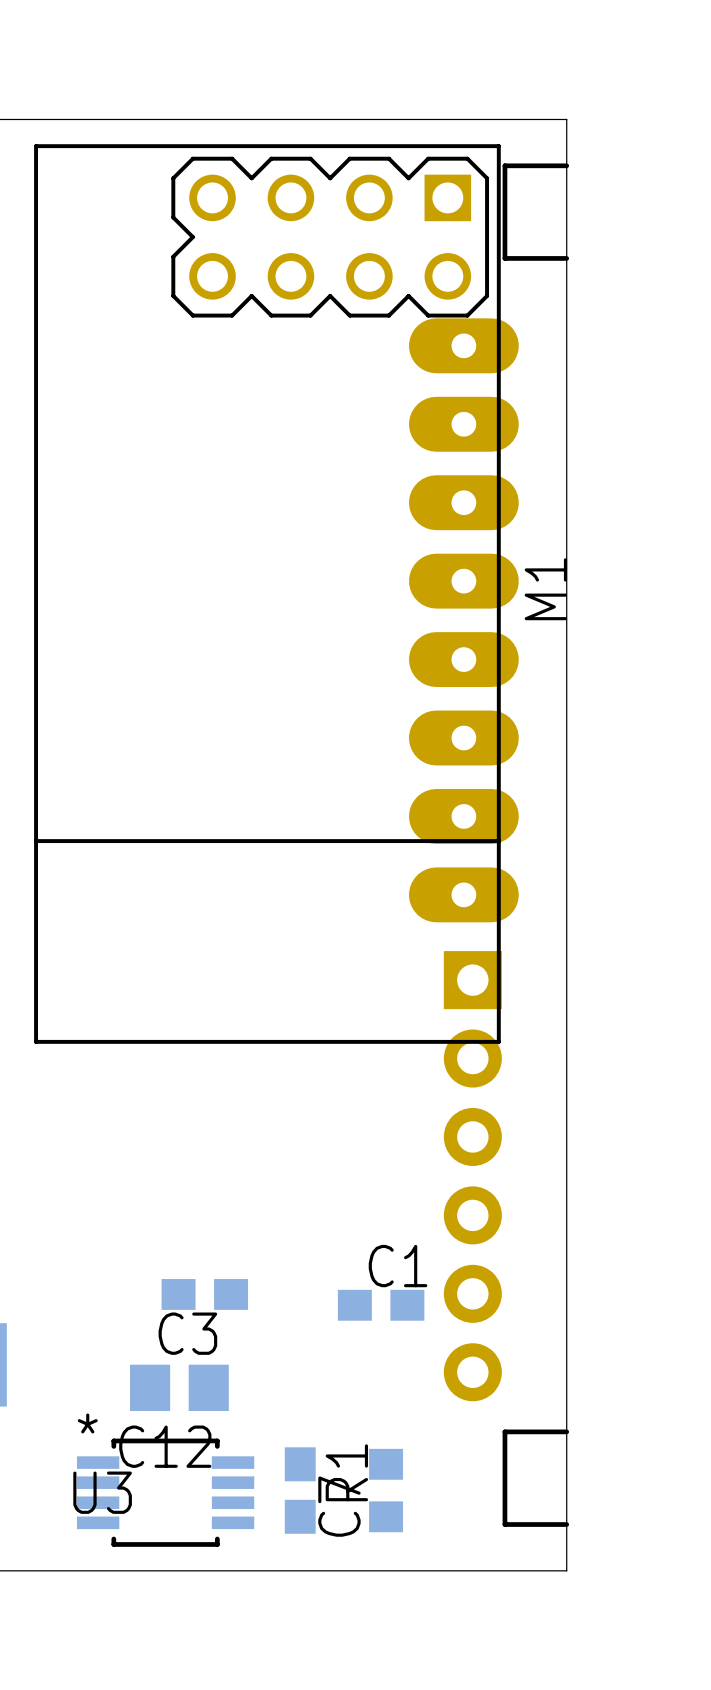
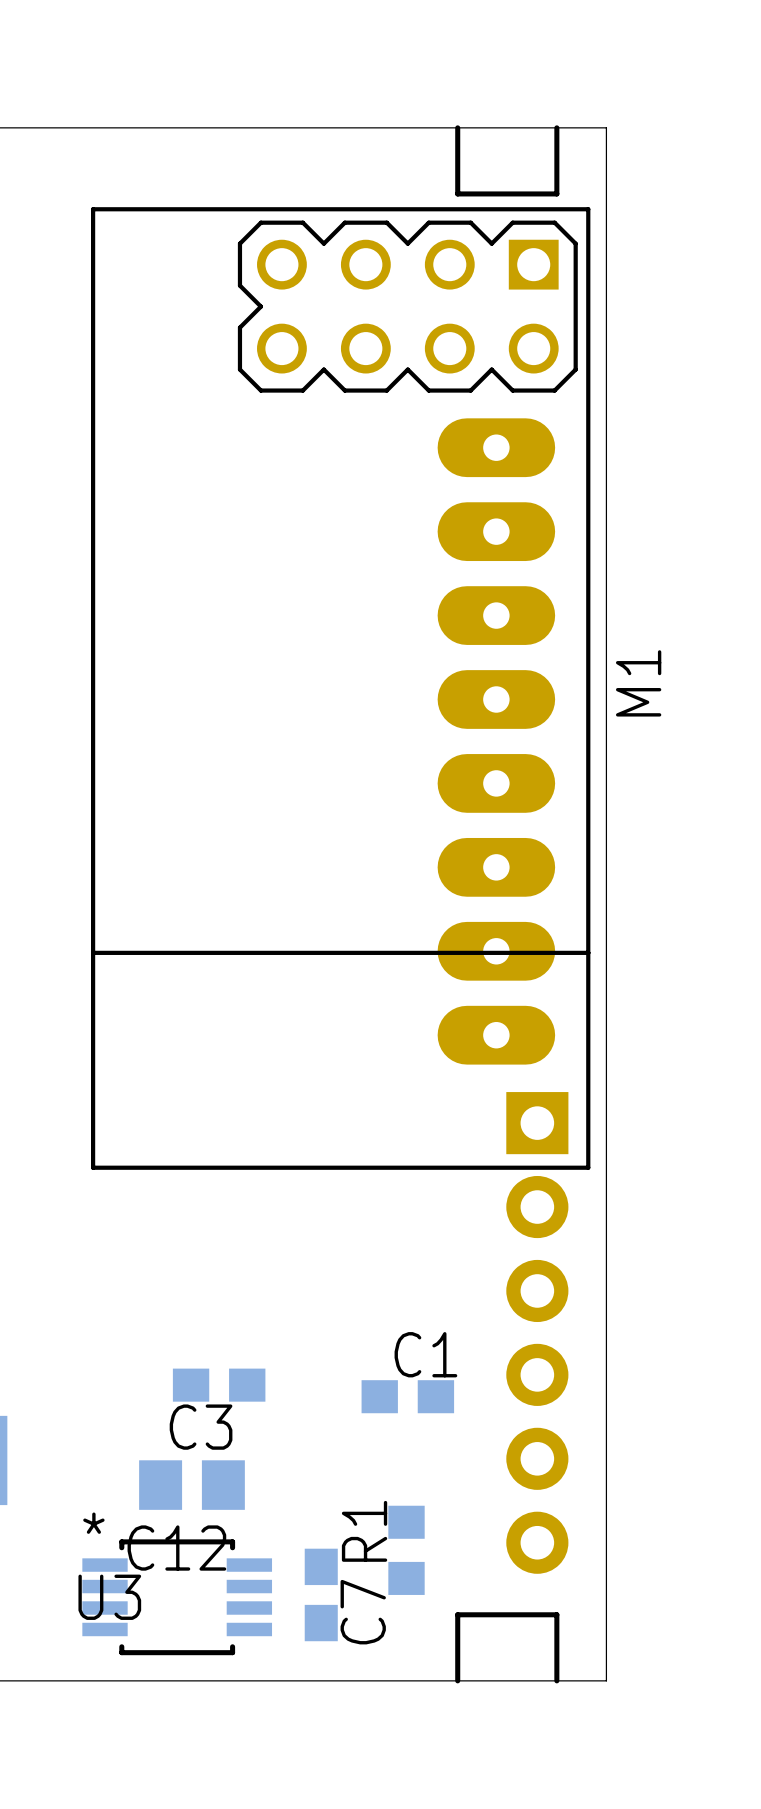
board edge: none -> (556, 127) (556, 193) (457, 193) (457, 127)
board edge: (566, 165) (504, 165) (504, 258) (566, 258) -> none
M1 position: (267, 594) -> (340, 688)
part position: (463, 620) -> (496, 741)
part position: (472, 1176) -> (537, 1332)
board edge: (566, 1431) (504, 1431) (504, 1524) (566, 1524) -> none
R1 position: (386, 1490) -> (406, 1550)
board edge: none -> (556, 1680) (556, 1614) (457, 1614) (457, 1680)

